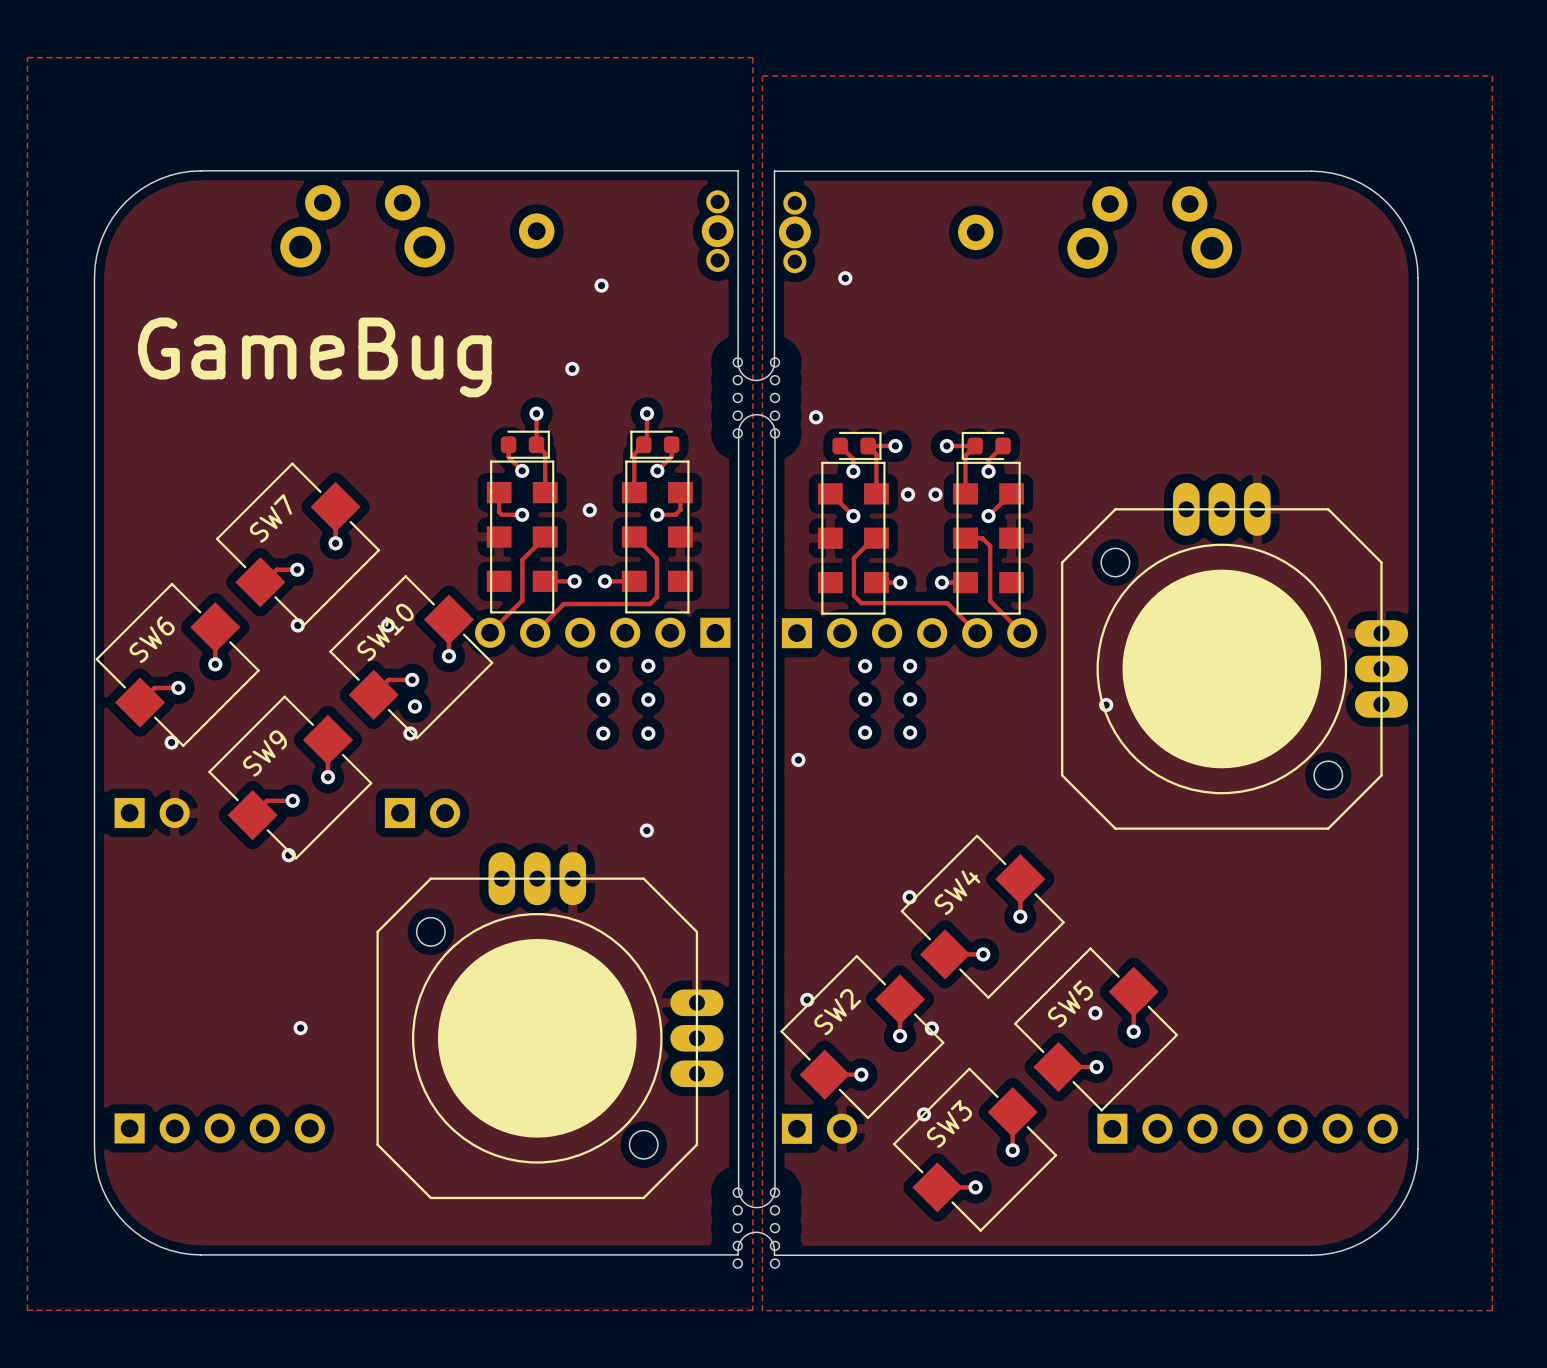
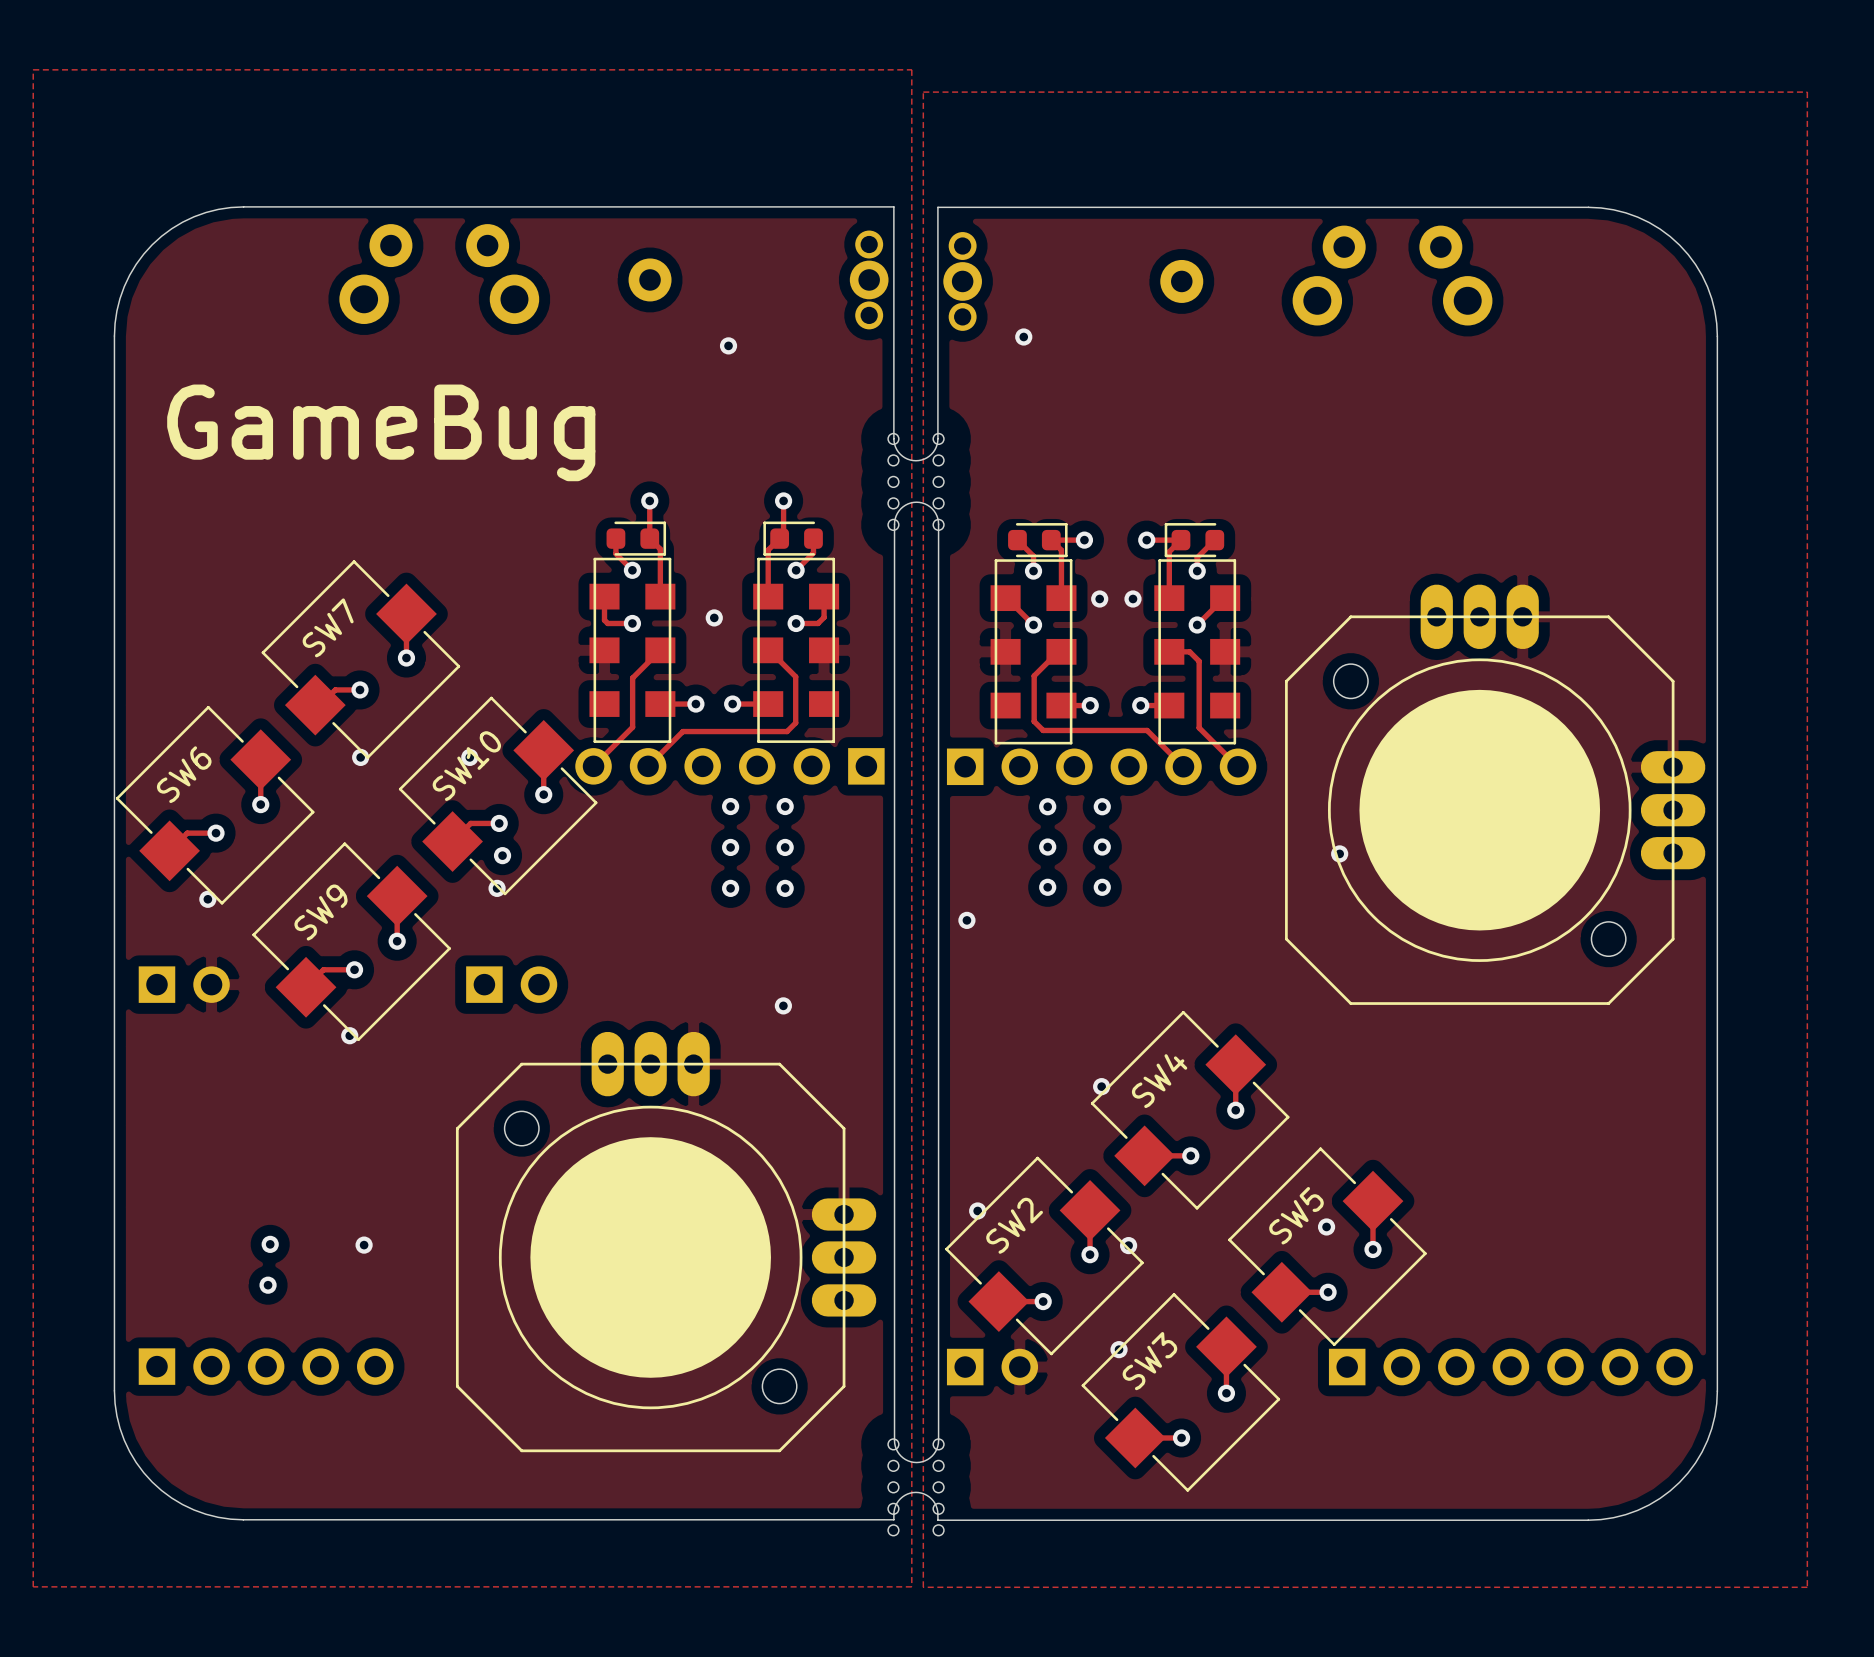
via: (572, 368) -> none
via: (816, 417) -> none
via: none -> (270, 1244)
via: none -> (268, 1285)

